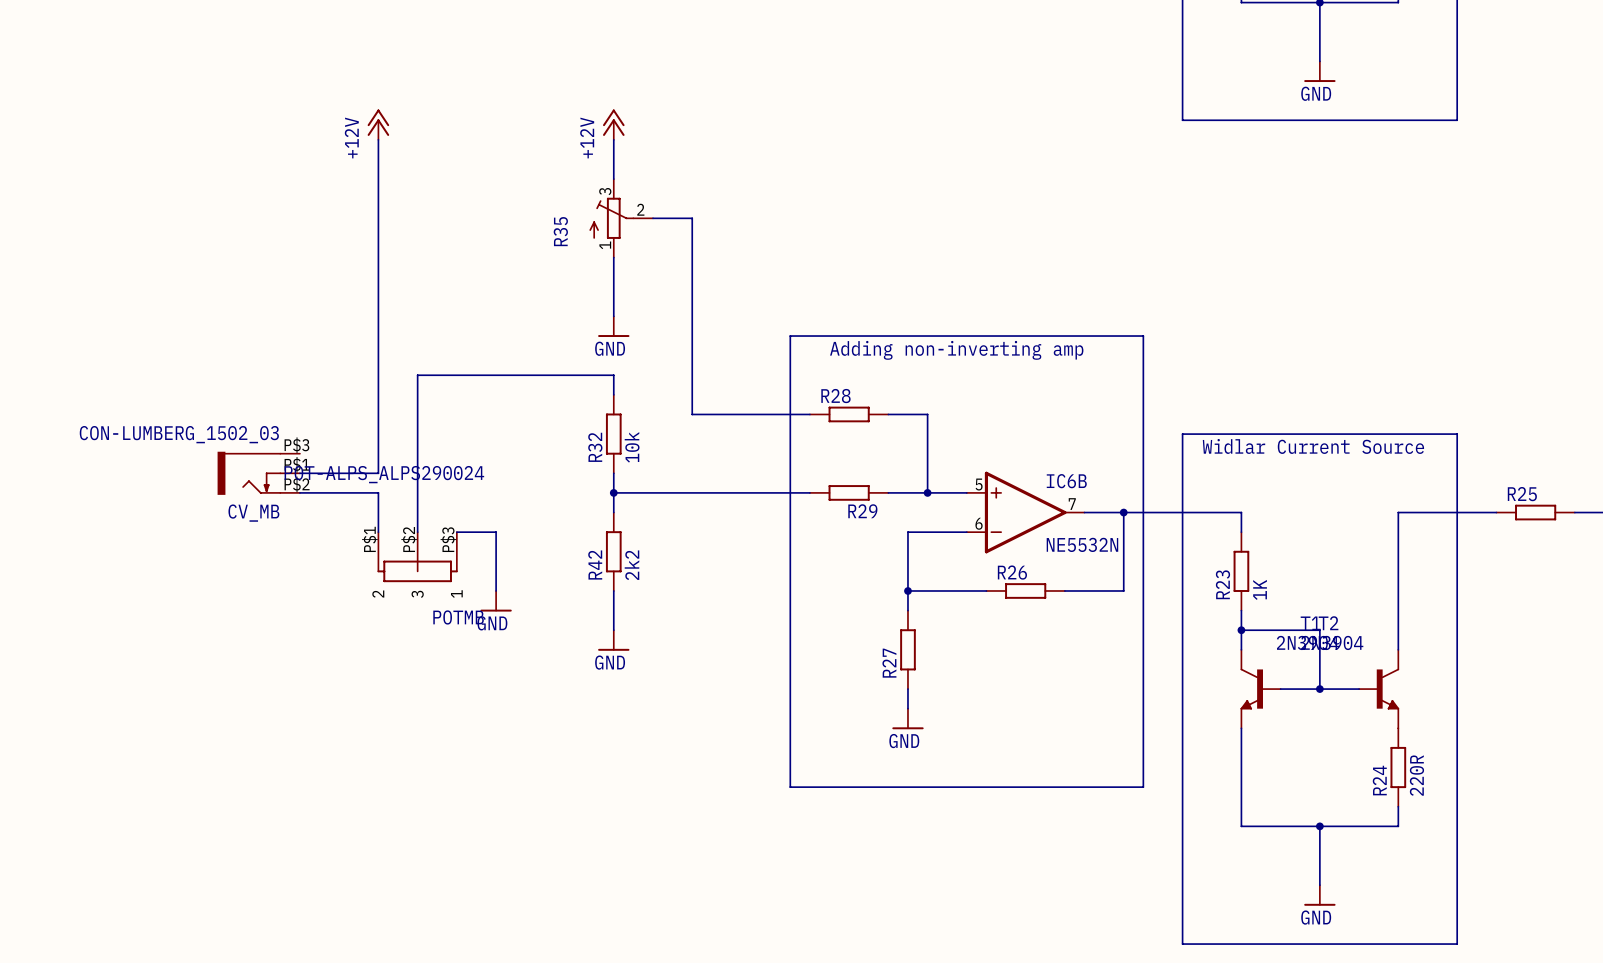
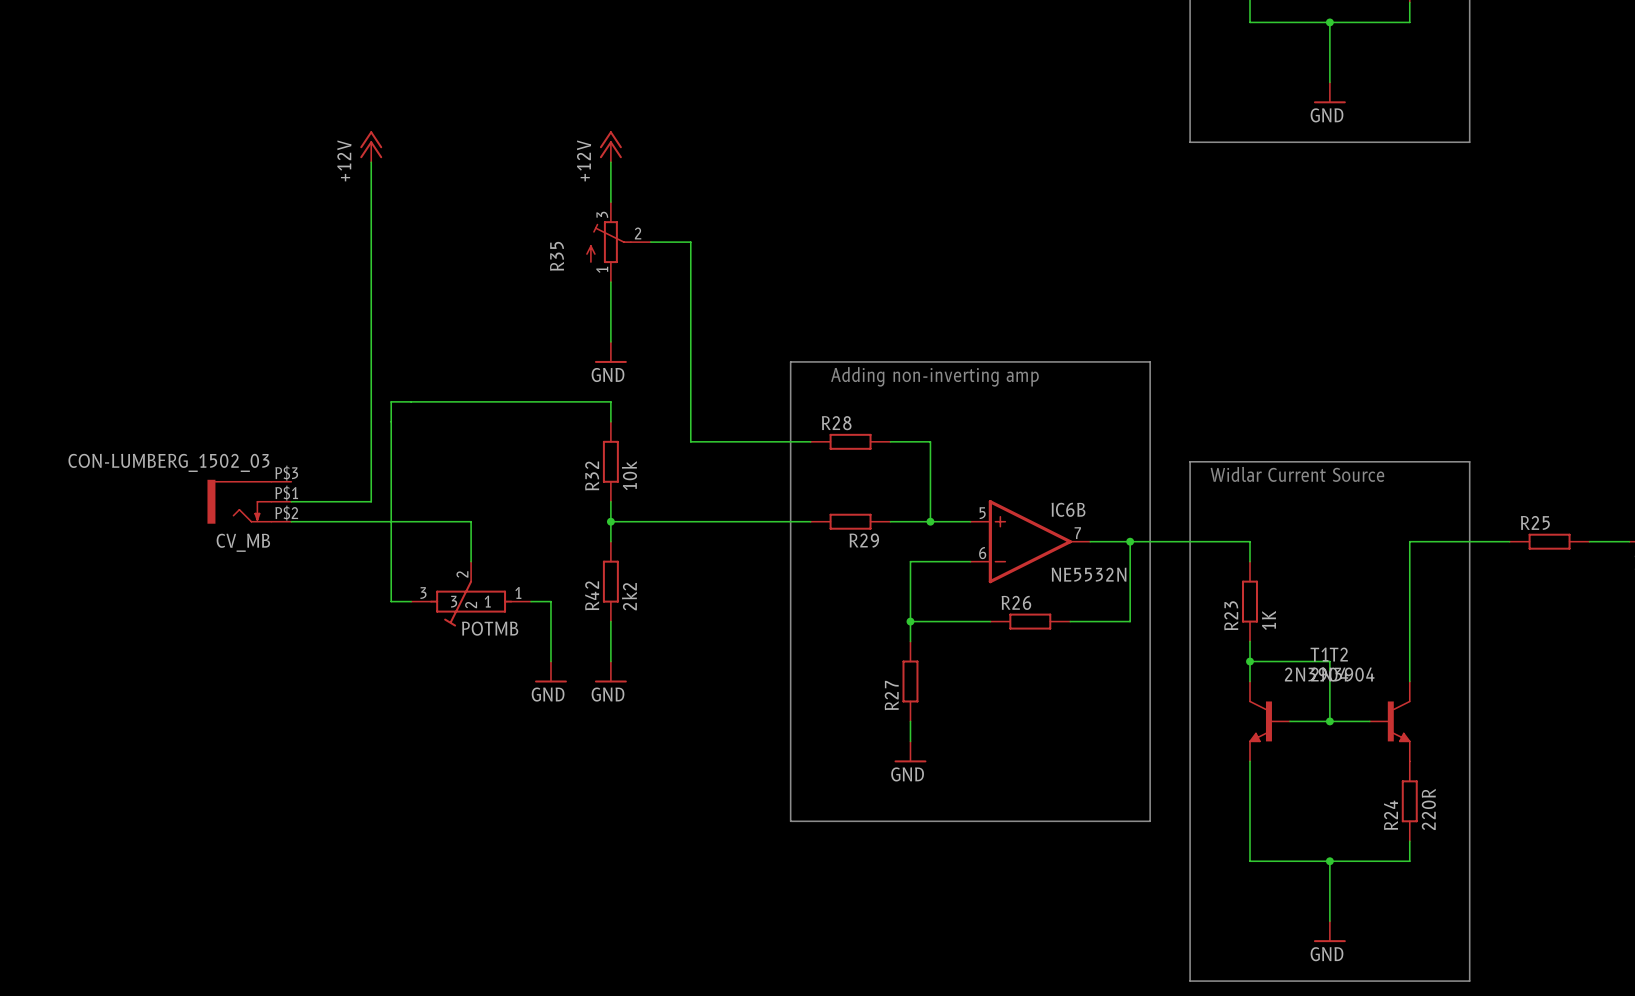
wire: (417, 375) (417, 532) -> (411, 401) (391, 401) (391, 601) (411, 601)
wire: (378, 492) (378, 532) -> (371, 521) (471, 521) (471, 561)
wire: (456, 532) (496, 532) (496, 590) -> none
POTMB: POT-ALPS_ALPS290024 (417, 557) -> none
POTMB: none -> (471, 594)
wire: none -> (531, 601) (550, 601) (550, 661)
power symbol position: GND (496, 601) -> GND (550, 672)

